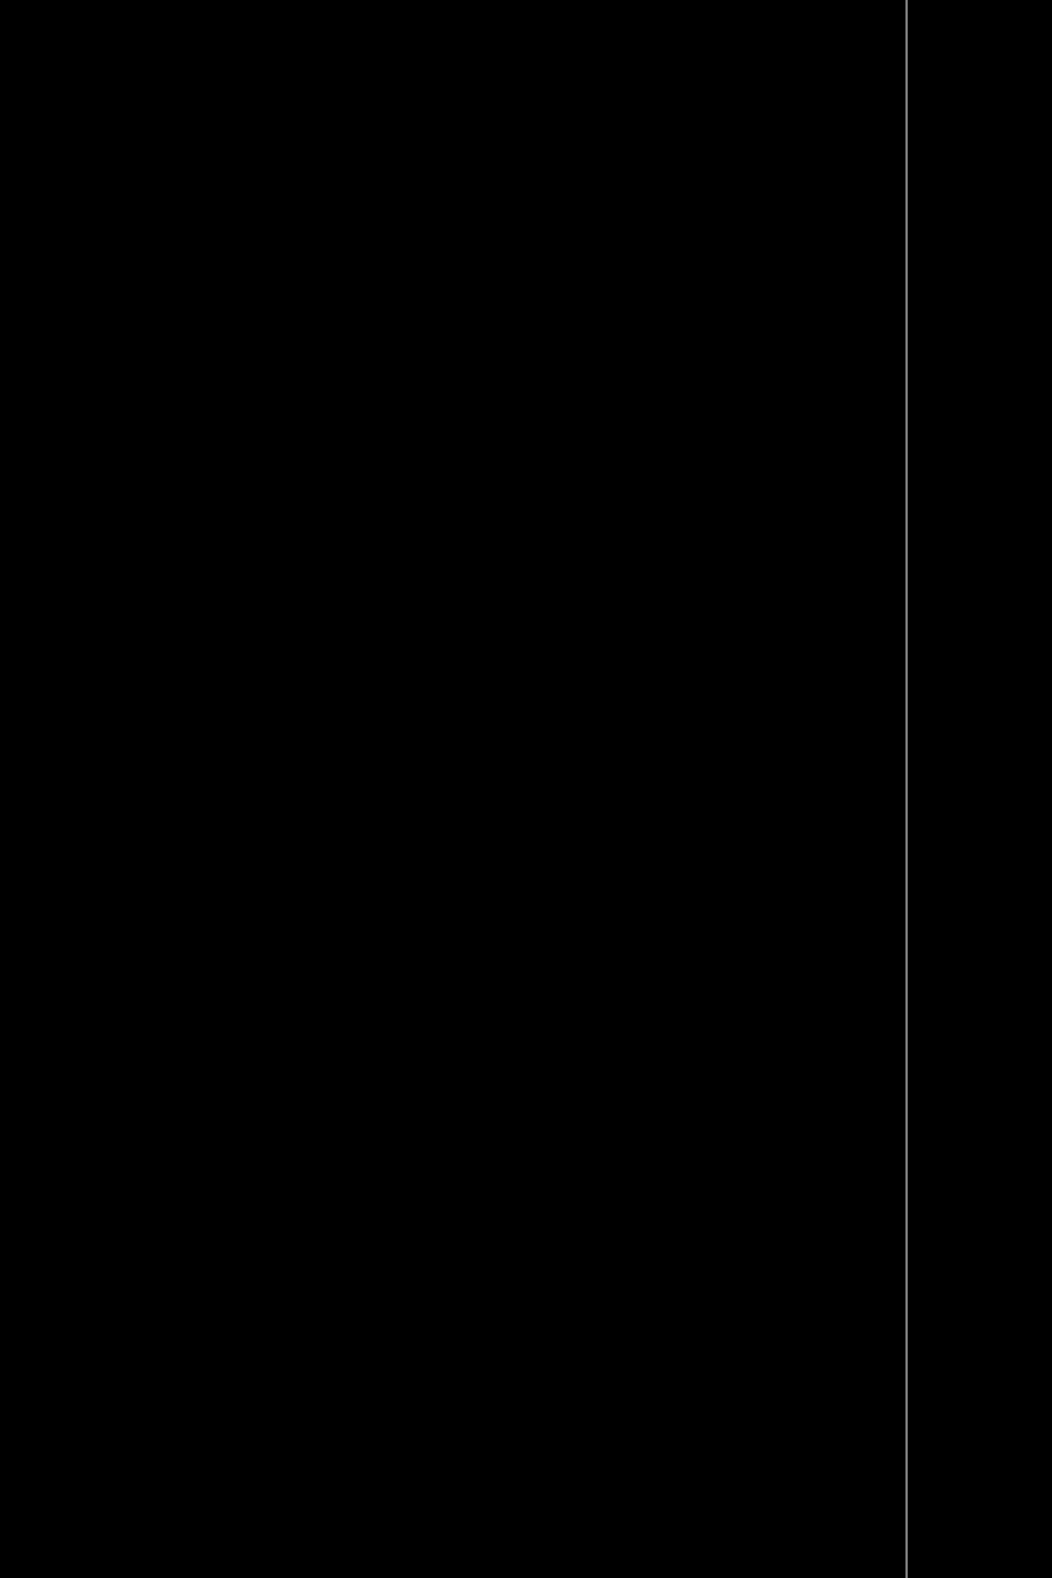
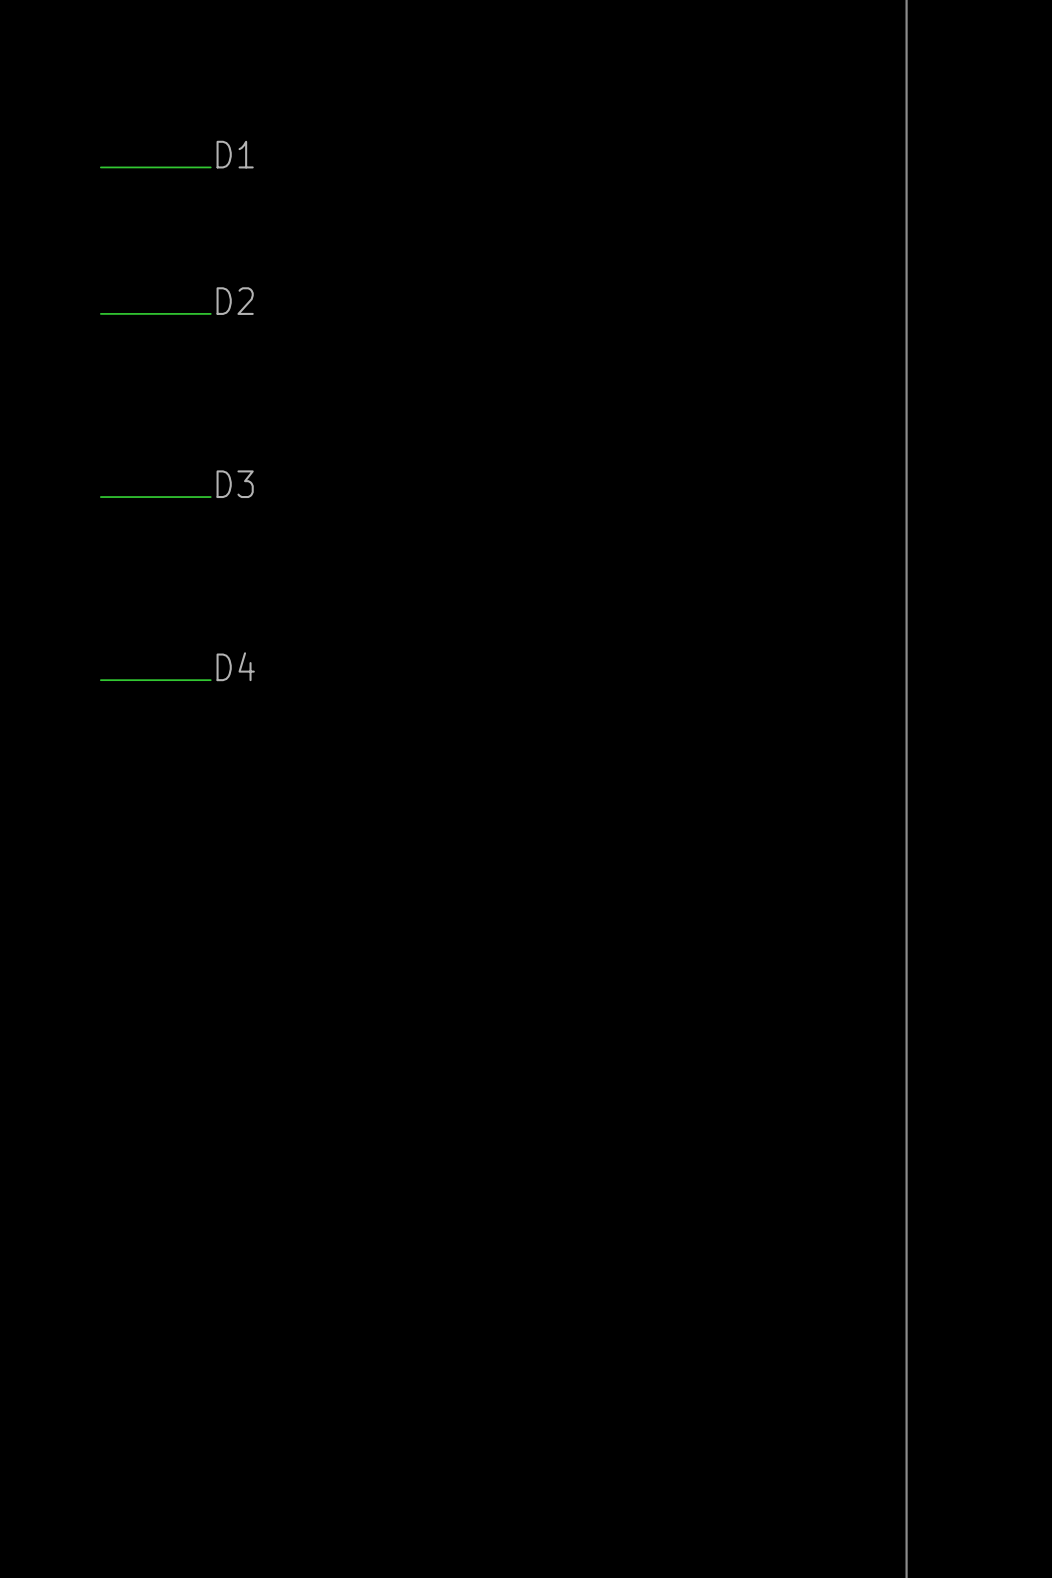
label: none -> D1 (235, 154)
wire: none -> (100, 167) (210, 167)
label: none -> D2 (235, 301)
wire: none -> (100, 313) (210, 313)
label: none -> D3 (235, 484)
wire: none -> (100, 497) (210, 497)
label: none -> D4 (235, 666)
wire: none -> (100, 680) (210, 680)

